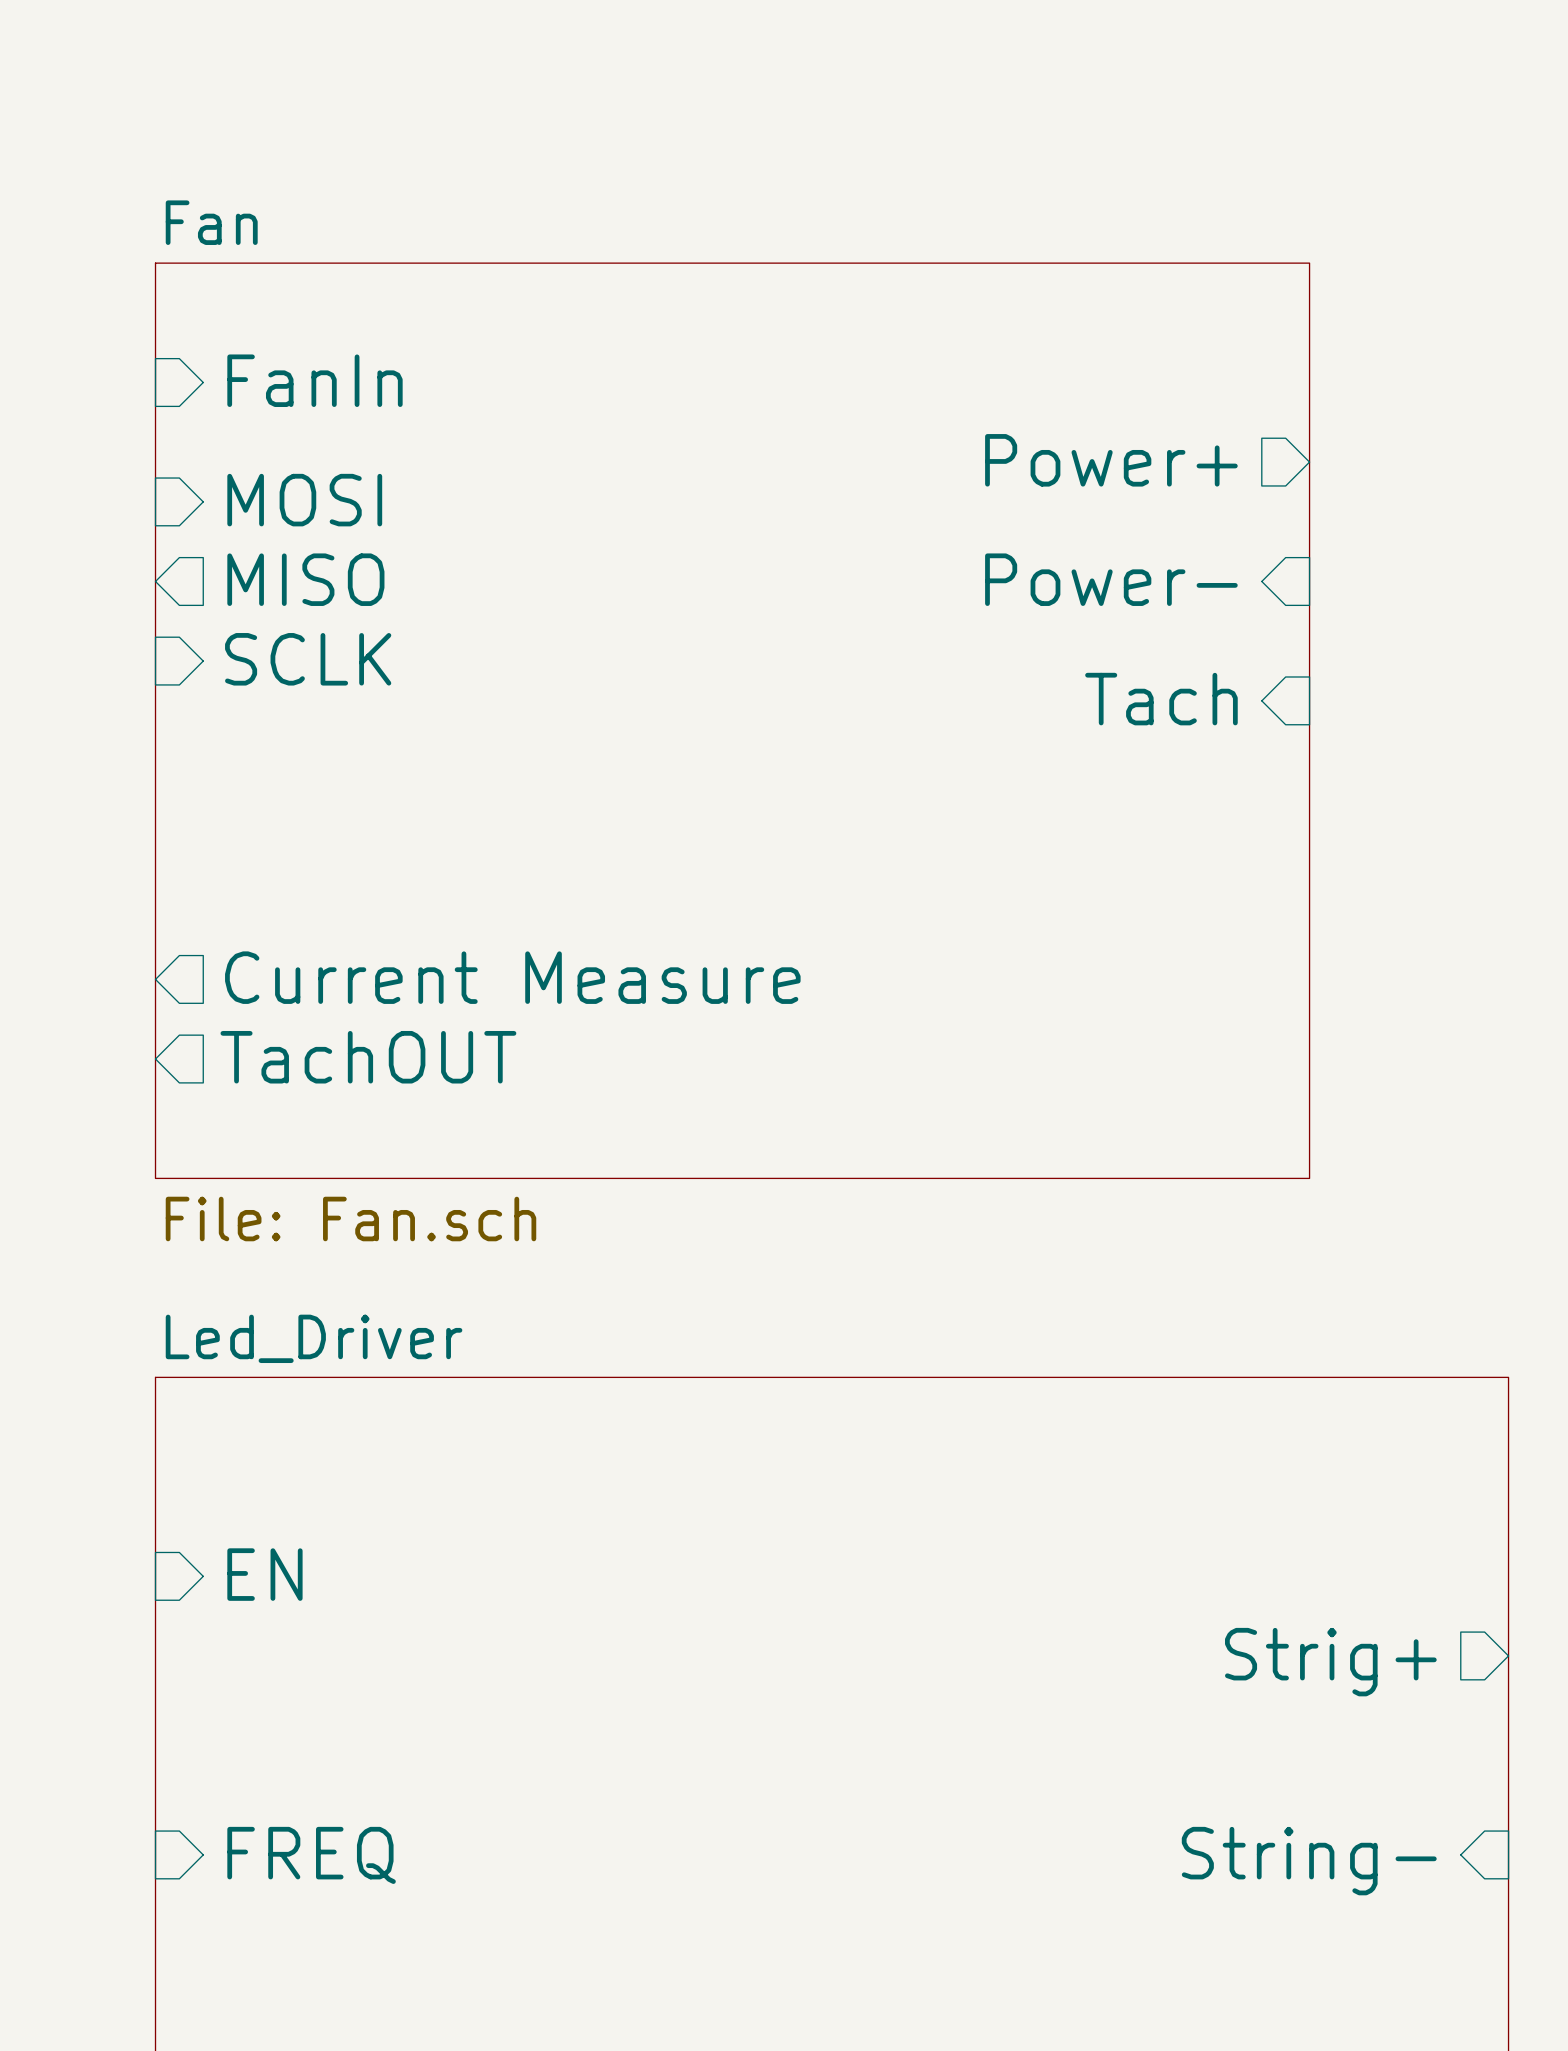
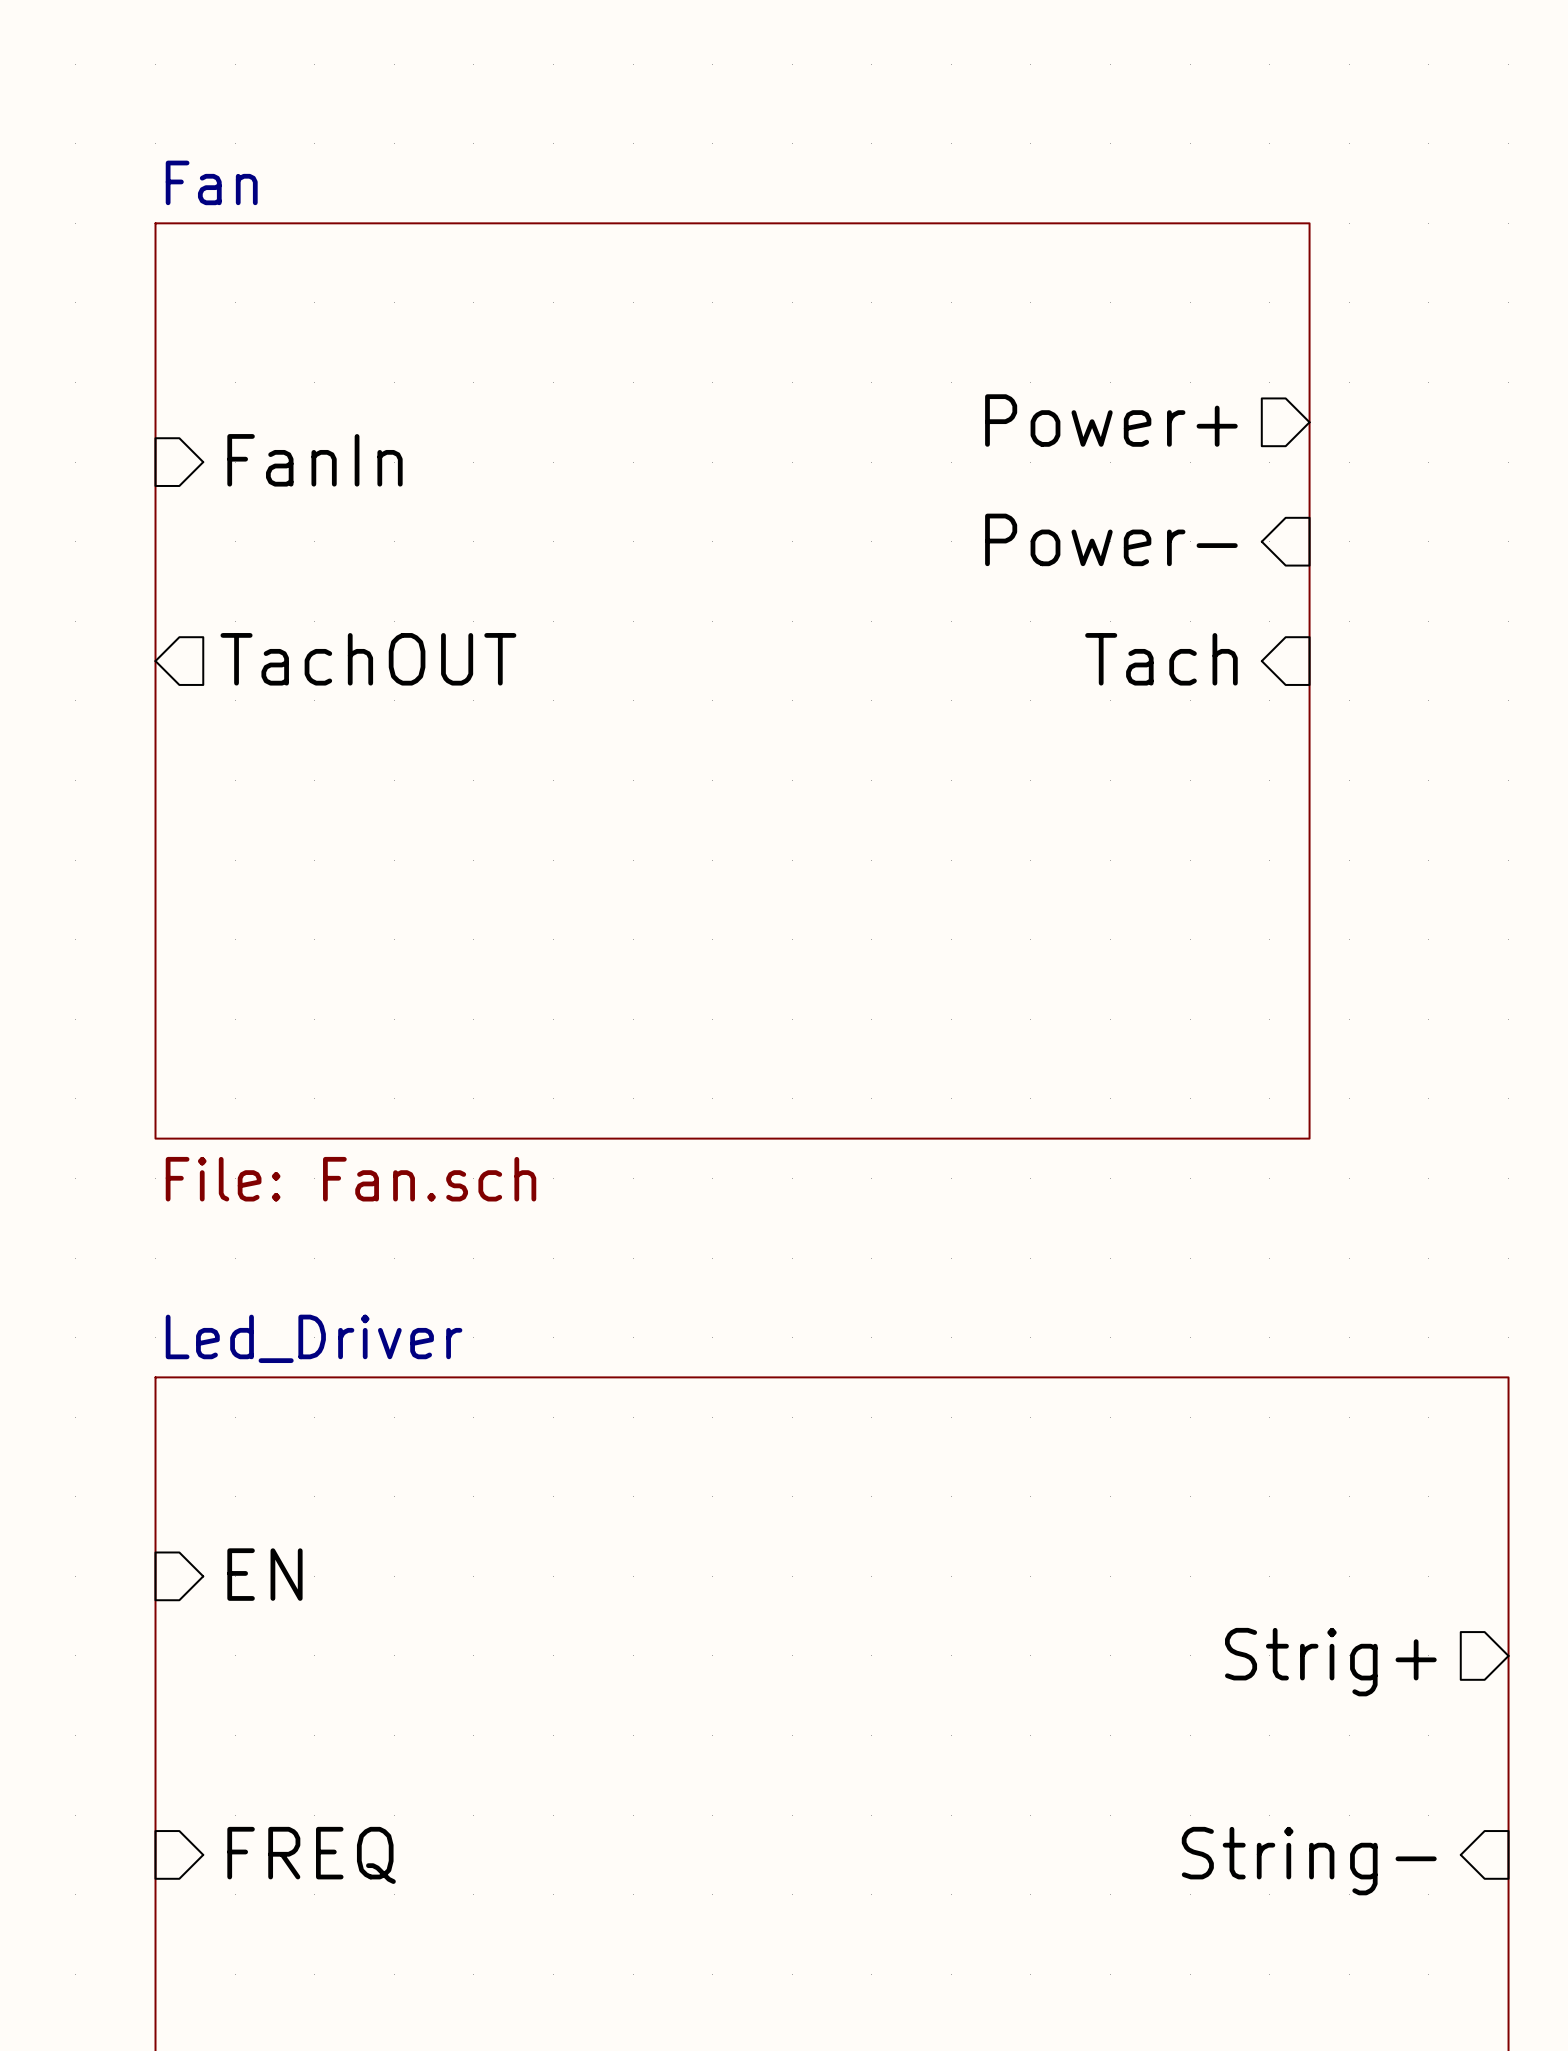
sheet pin position: FanIn (314, 380) -> FanIn (314, 460)
sheet pin position: Power+ (1111, 460) -> Power+ (1111, 420)
sheet pin: MOSI (304, 500) -> none
sheet pin: MISO (305, 579) -> none
sheet pin position: Power- (1111, 579) -> Power- (1111, 539)
sheet pin shape: input (308, 659) -> output (368, 659)
sheet pin: SCLK (308, 659) -> TachOUT (368, 659)
sheet pin position: Tach (1161, 699) -> Tach (1161, 659)
sheet Fan position: (732, 720) -> (732, 680)
sheet pin: Current Measure (512, 977) -> none
sheet pin: TachOUT (368, 1057) -> none

